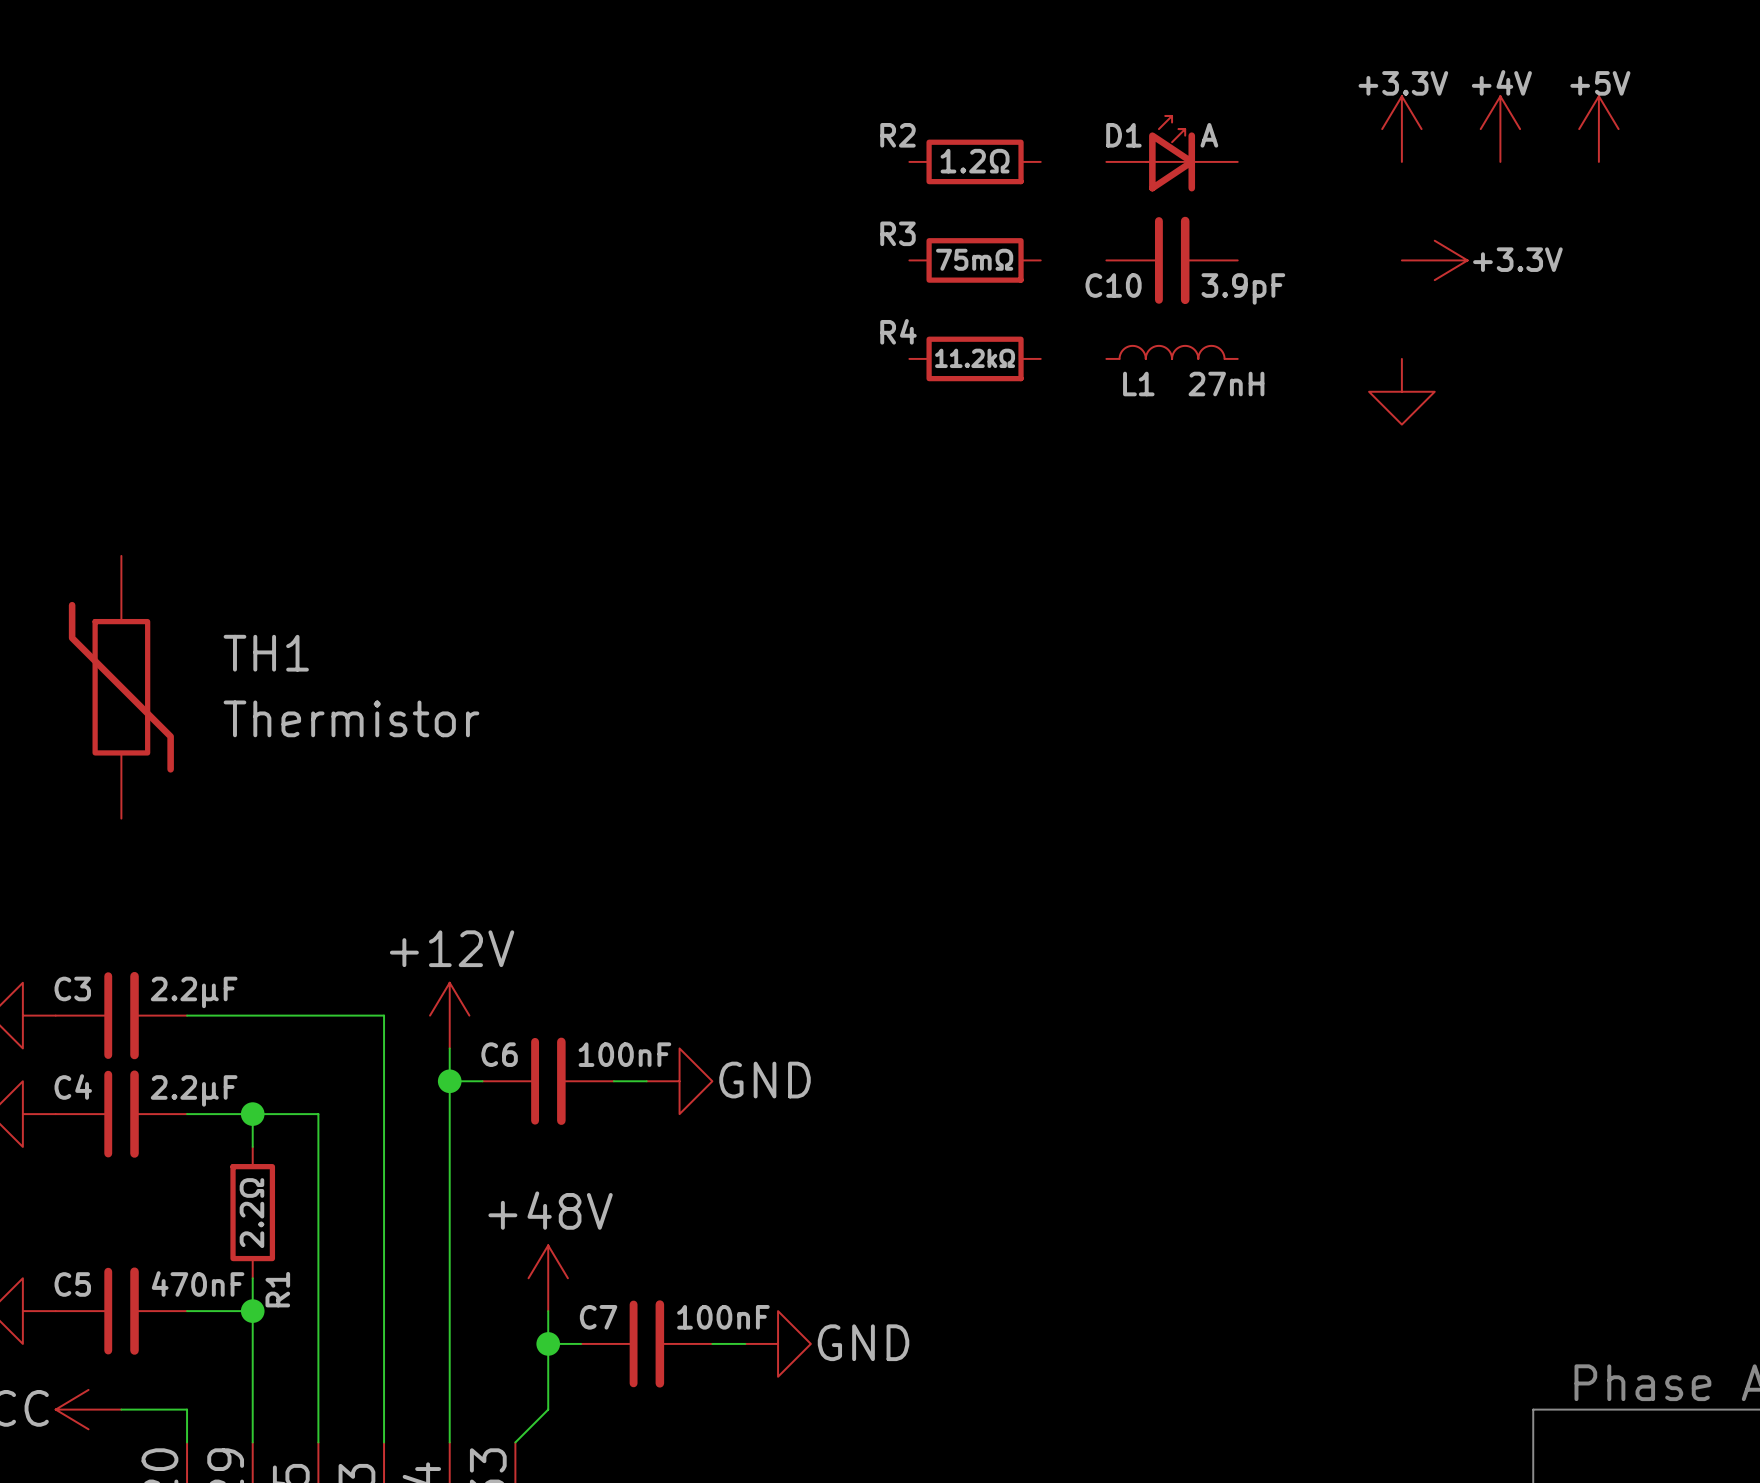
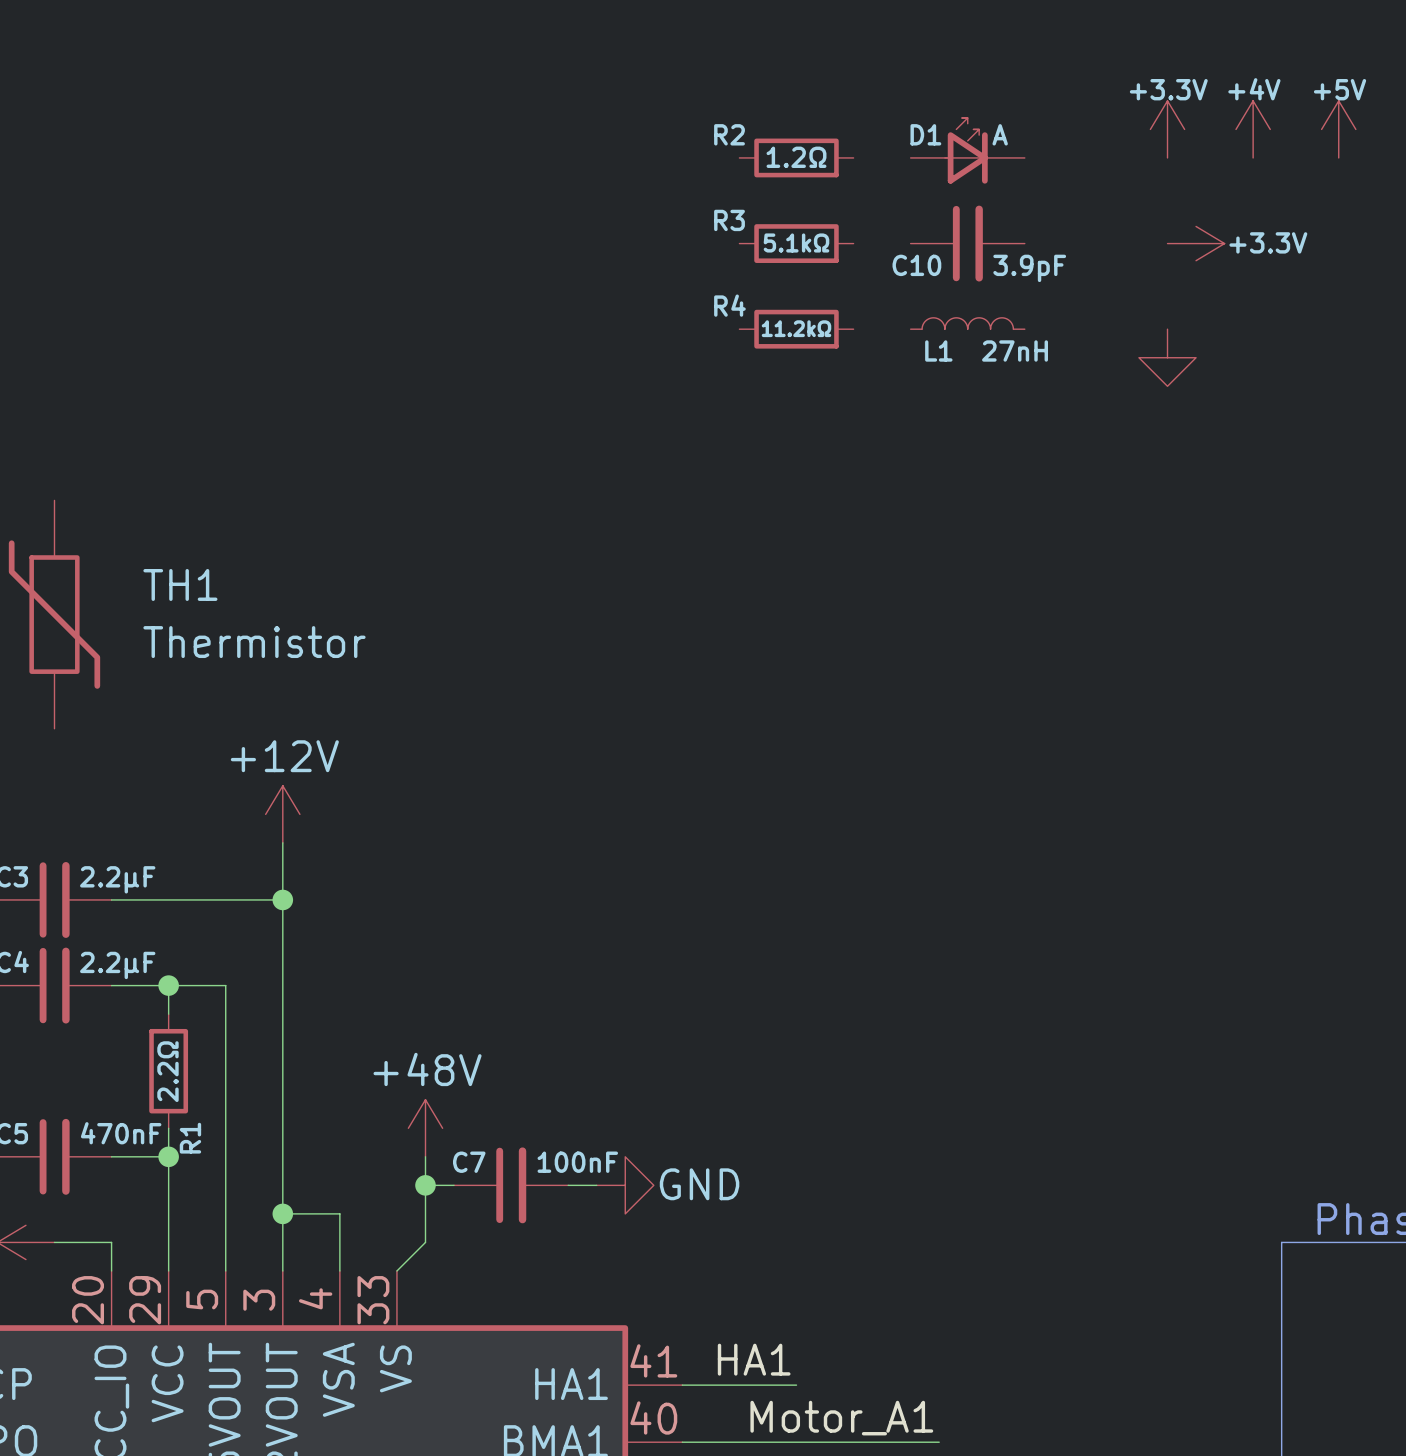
R3 value: 75mΩ (974, 259) -> 5.1kΩ (796, 242)
wire: none -> (282, 842) (282, 899)
power symbol position: +12V (449, 1015) -> +12V (282, 814)
wire: (449, 1048) (449, 1376) -> (282, 1213) (339, 1213)
wire: (449, 1081) (482, 1081) -> none
junction position: (449, 1081) -> (282, 899)
C6: 100nF (548, 1081) -> none
wire: (613, 1081) (646, 1081) -> none
power symbol: GND (679, 1081) -> none
junction: none -> (282, 1213)

